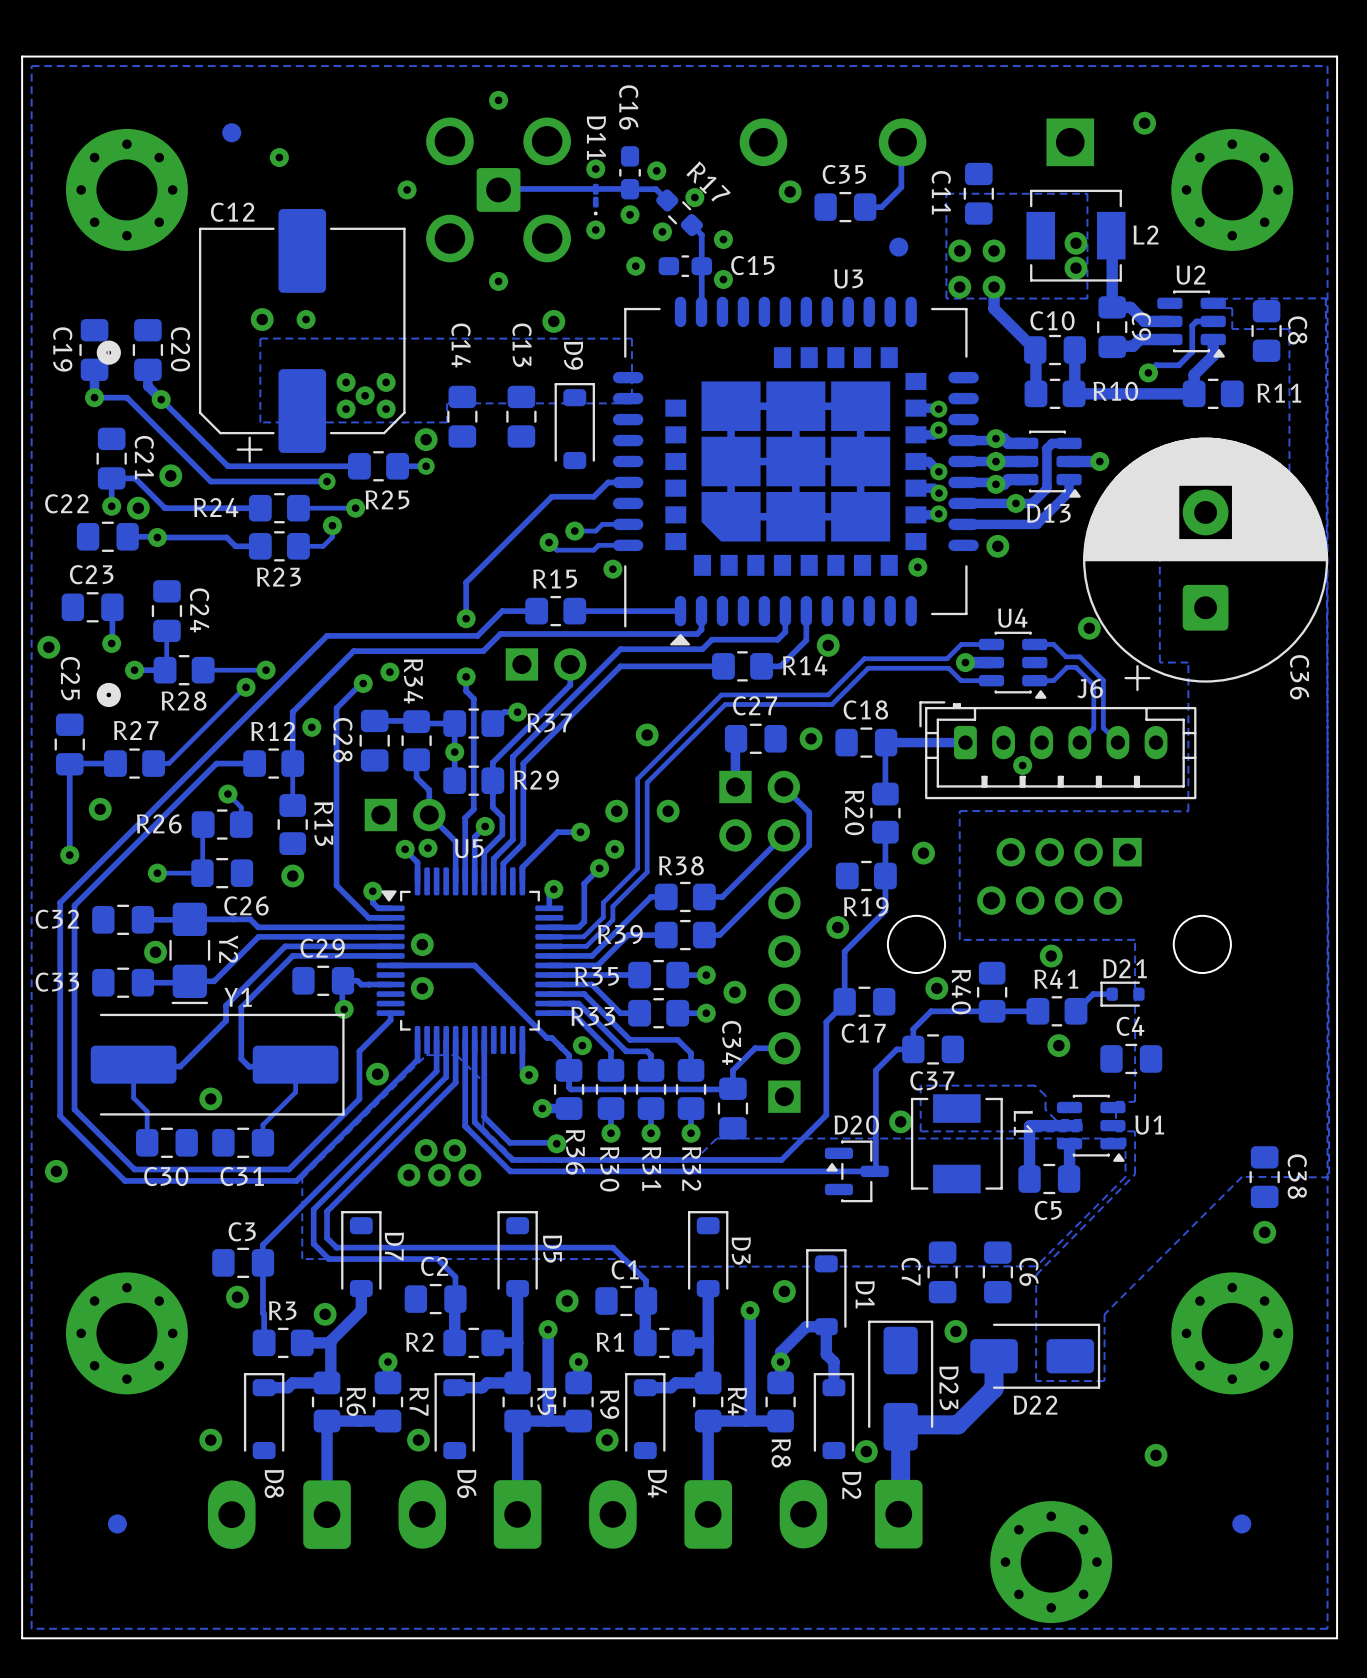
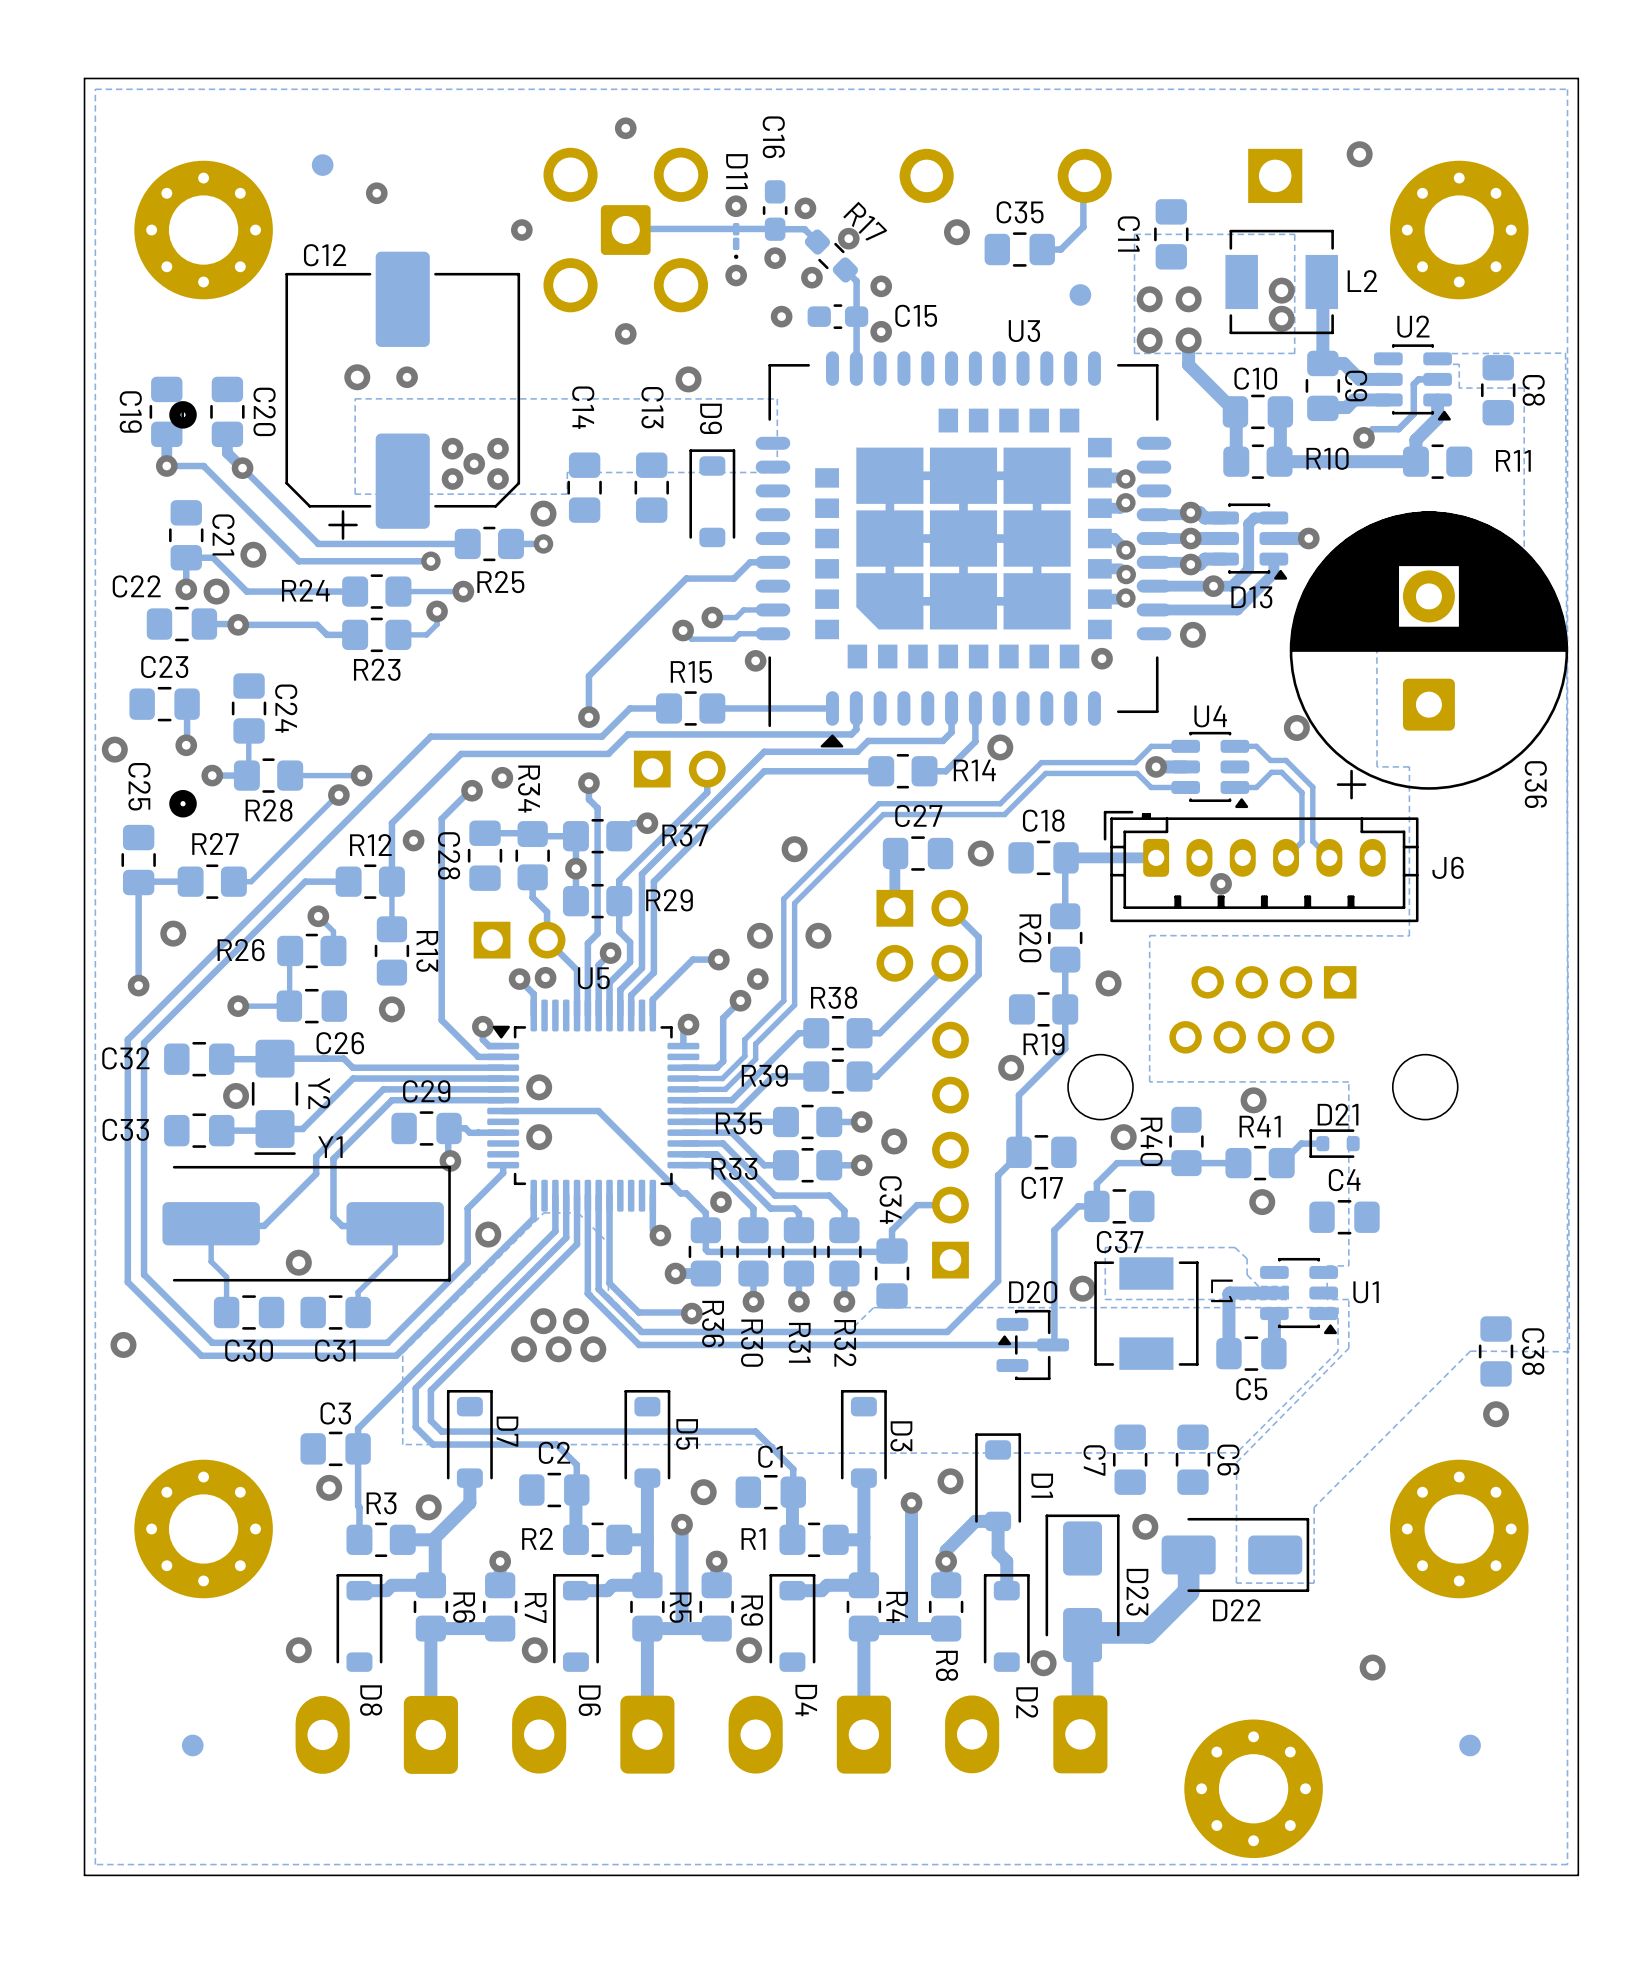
J6 name position: J6 (1090, 688) -> J6 (1448, 867)

